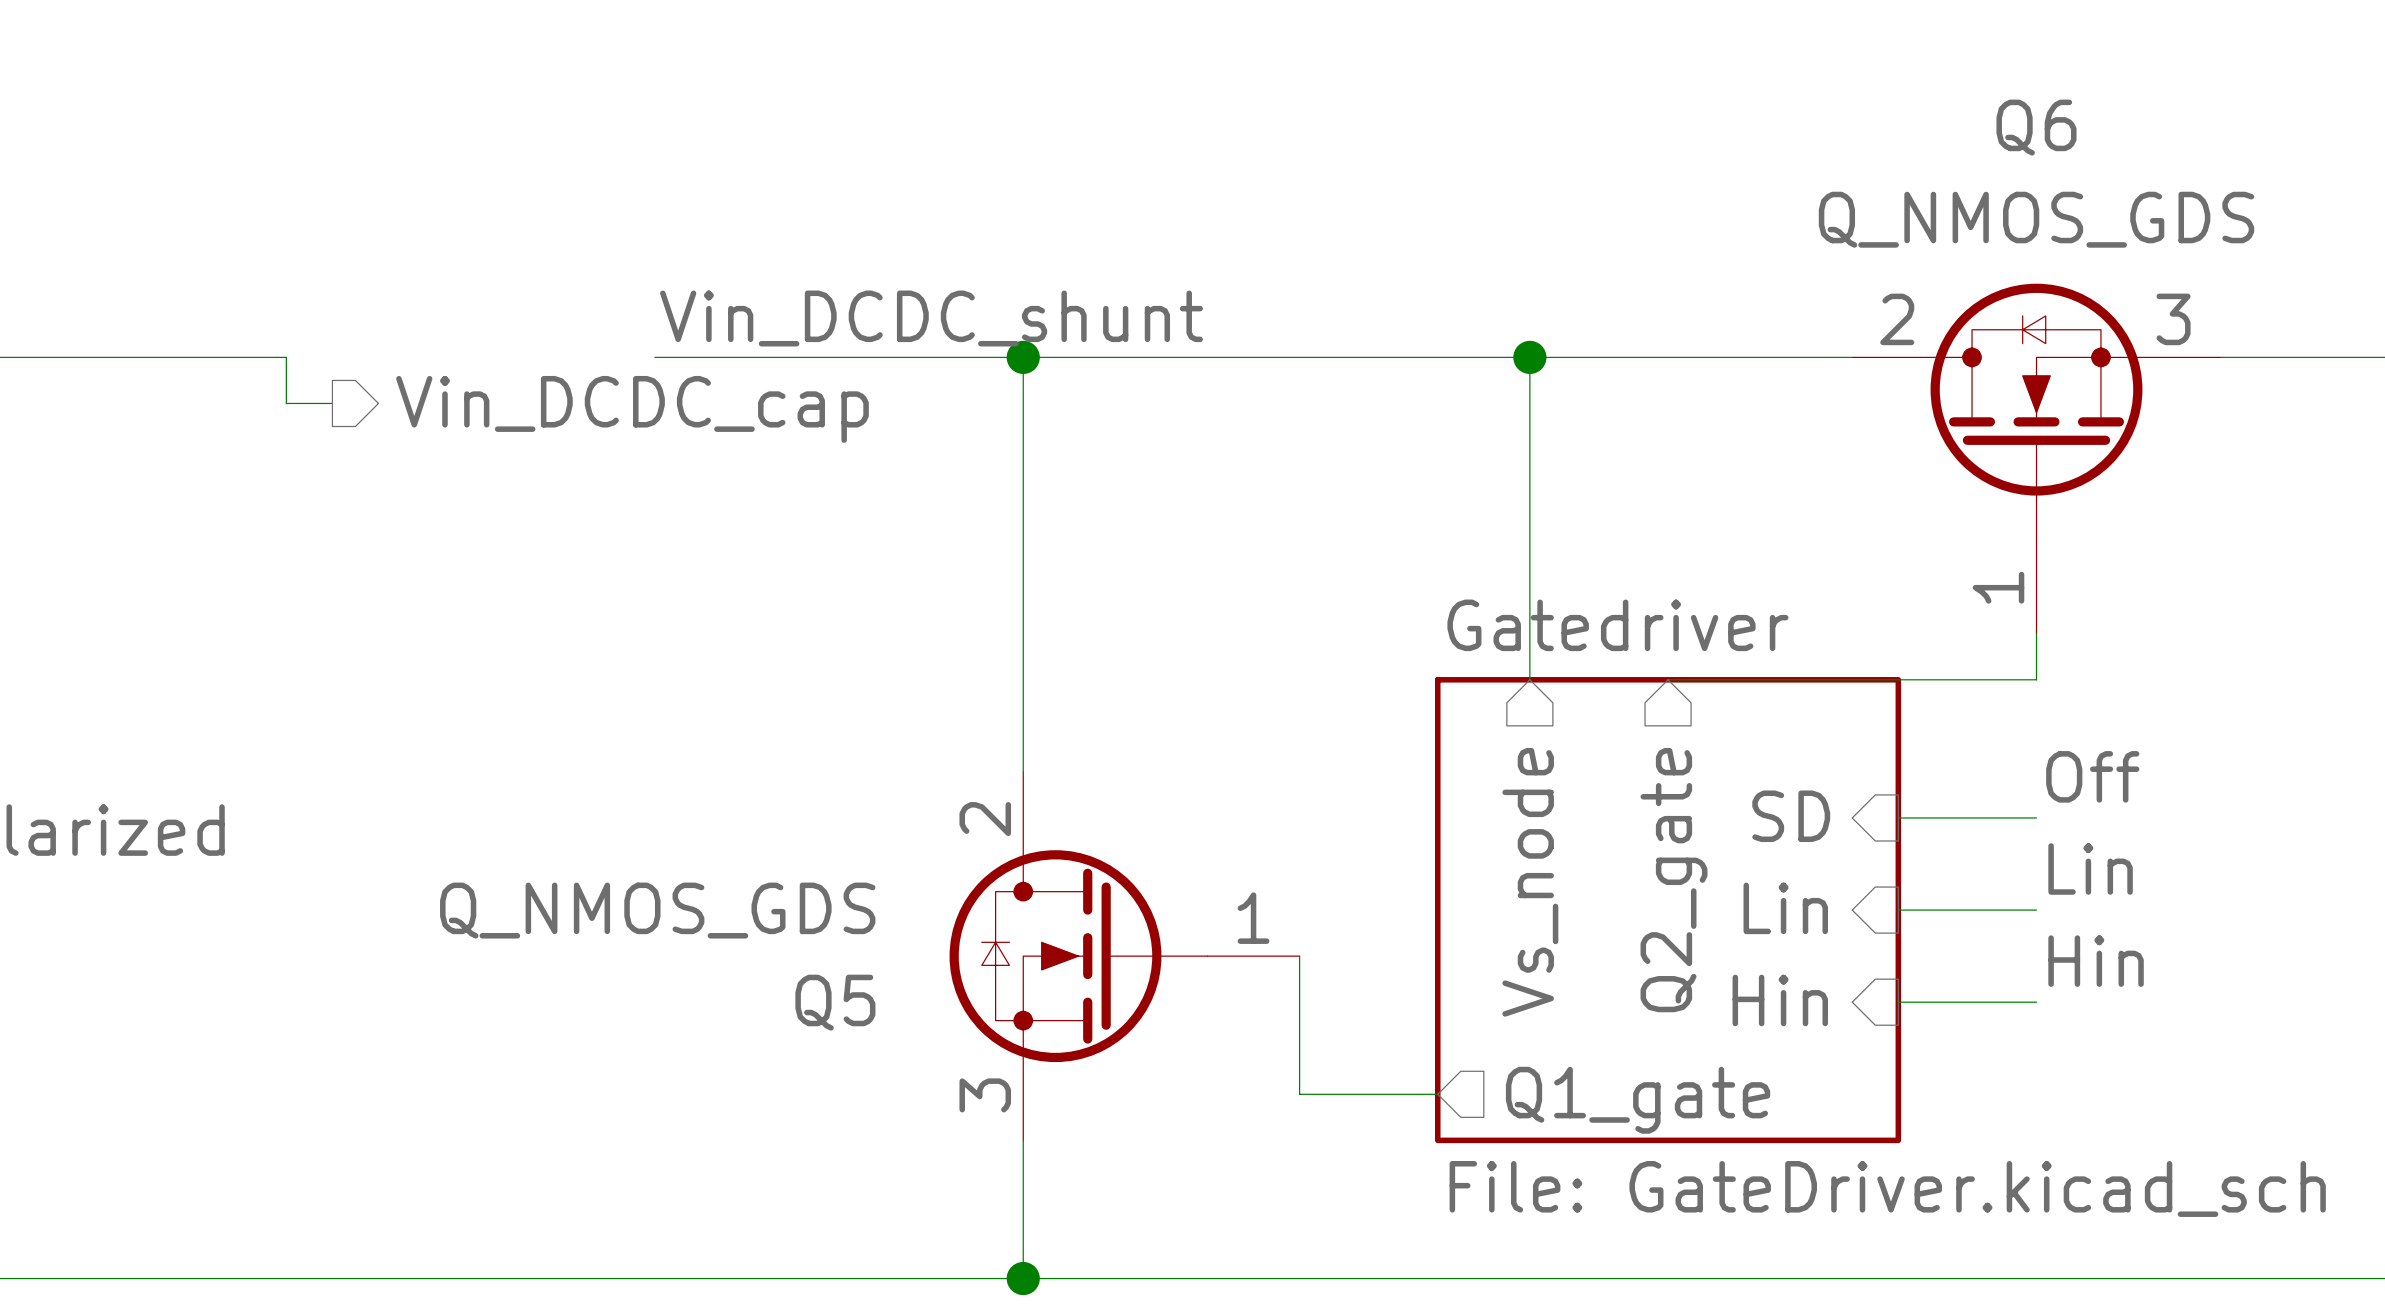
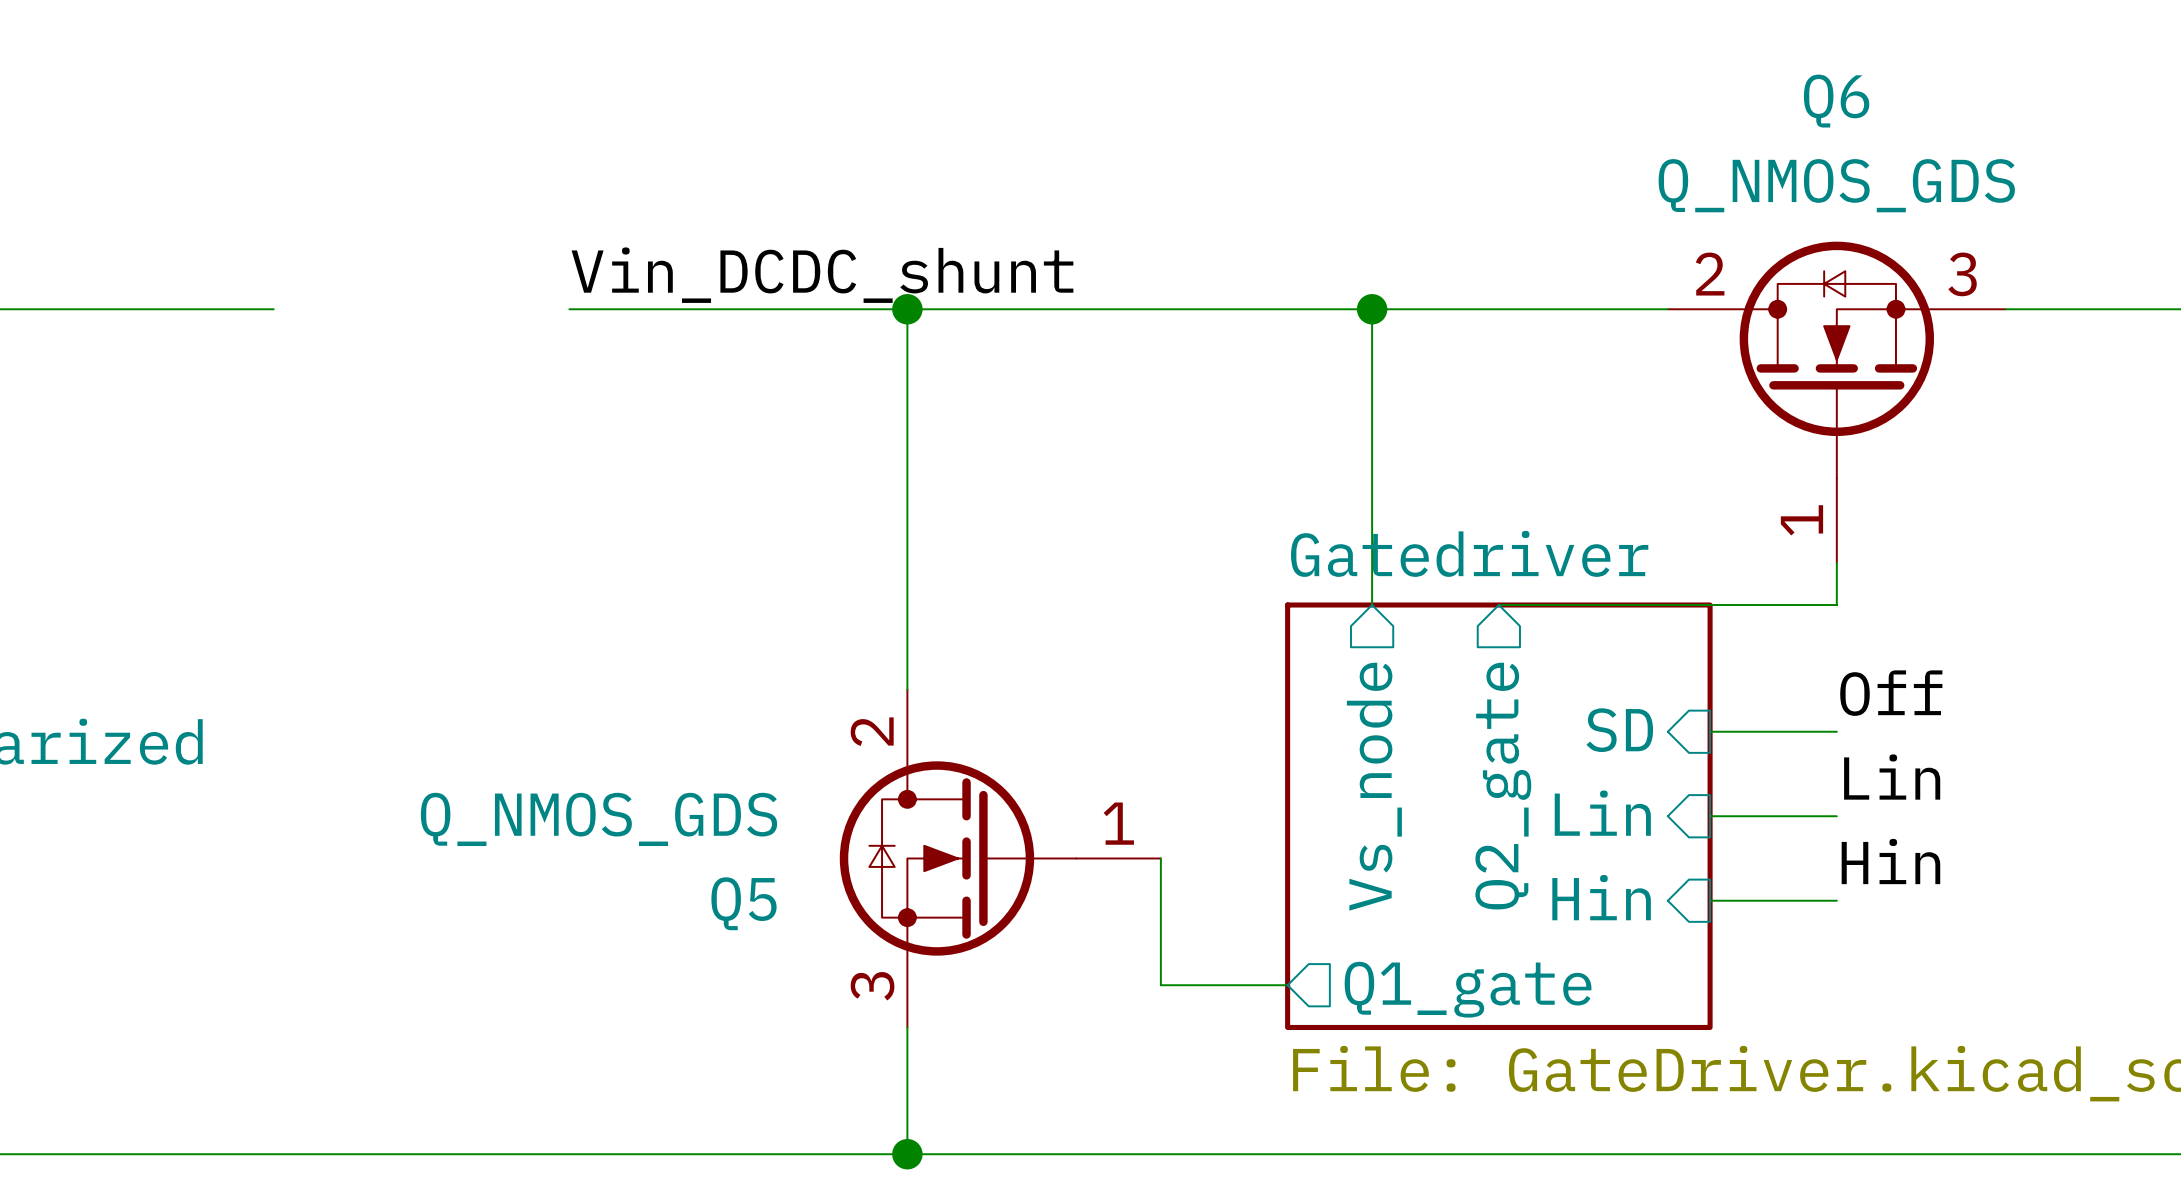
wire: (286, 357) (286, 403) (332, 403) -> (231, 309) (273, 309)
hierarchical label: Vin_DCDC_cap (632, 409) -> none

